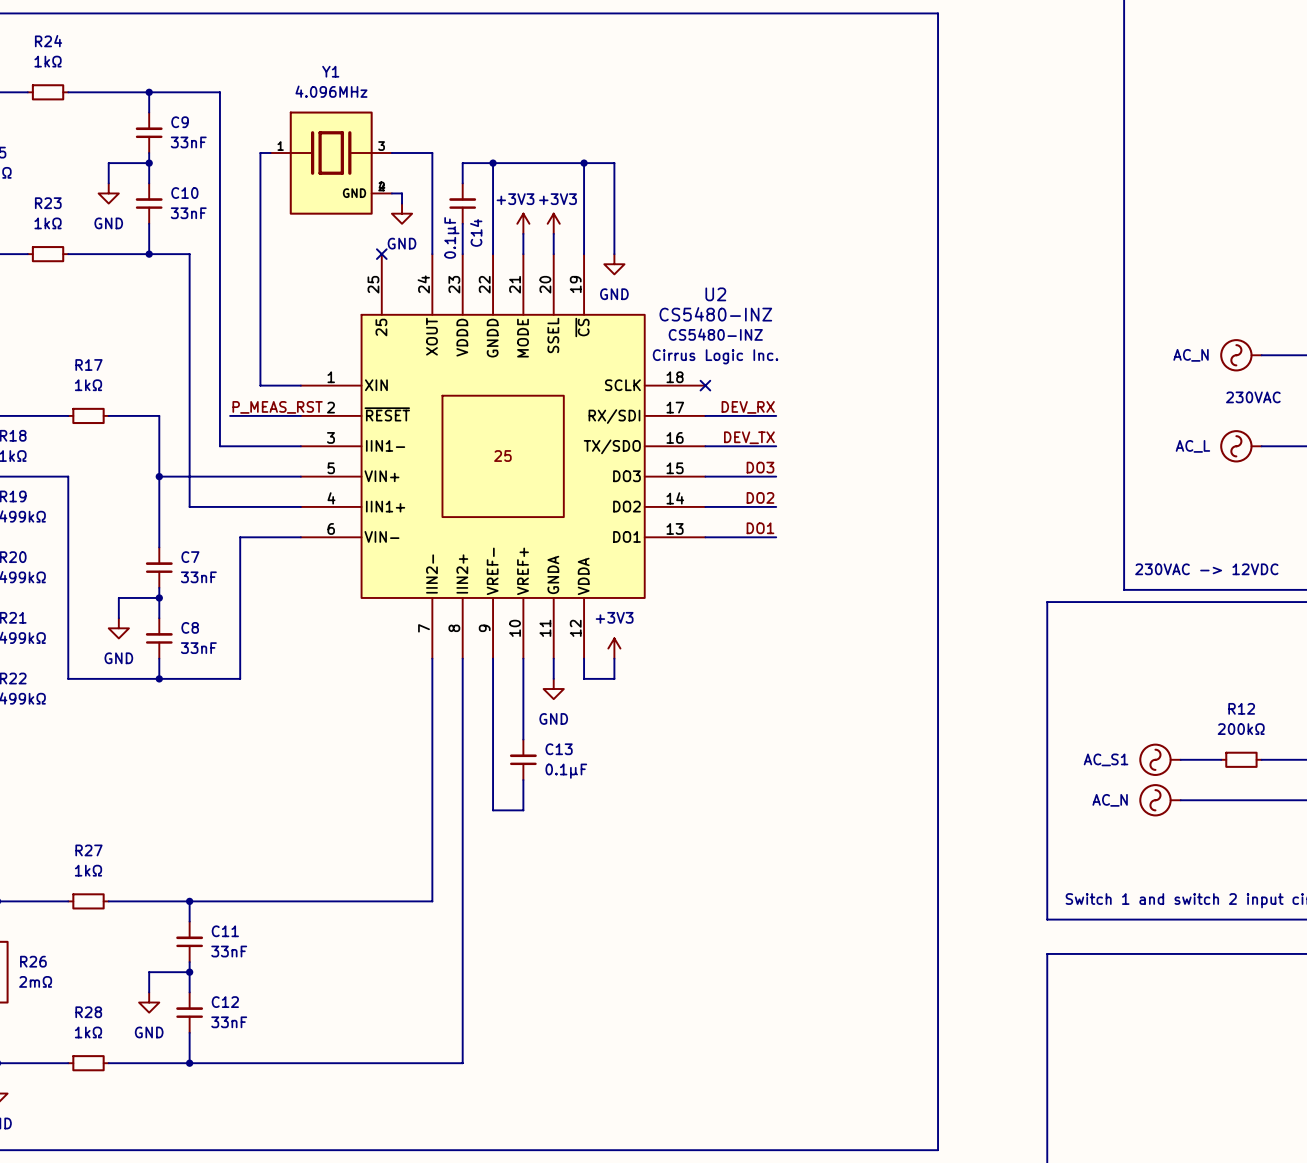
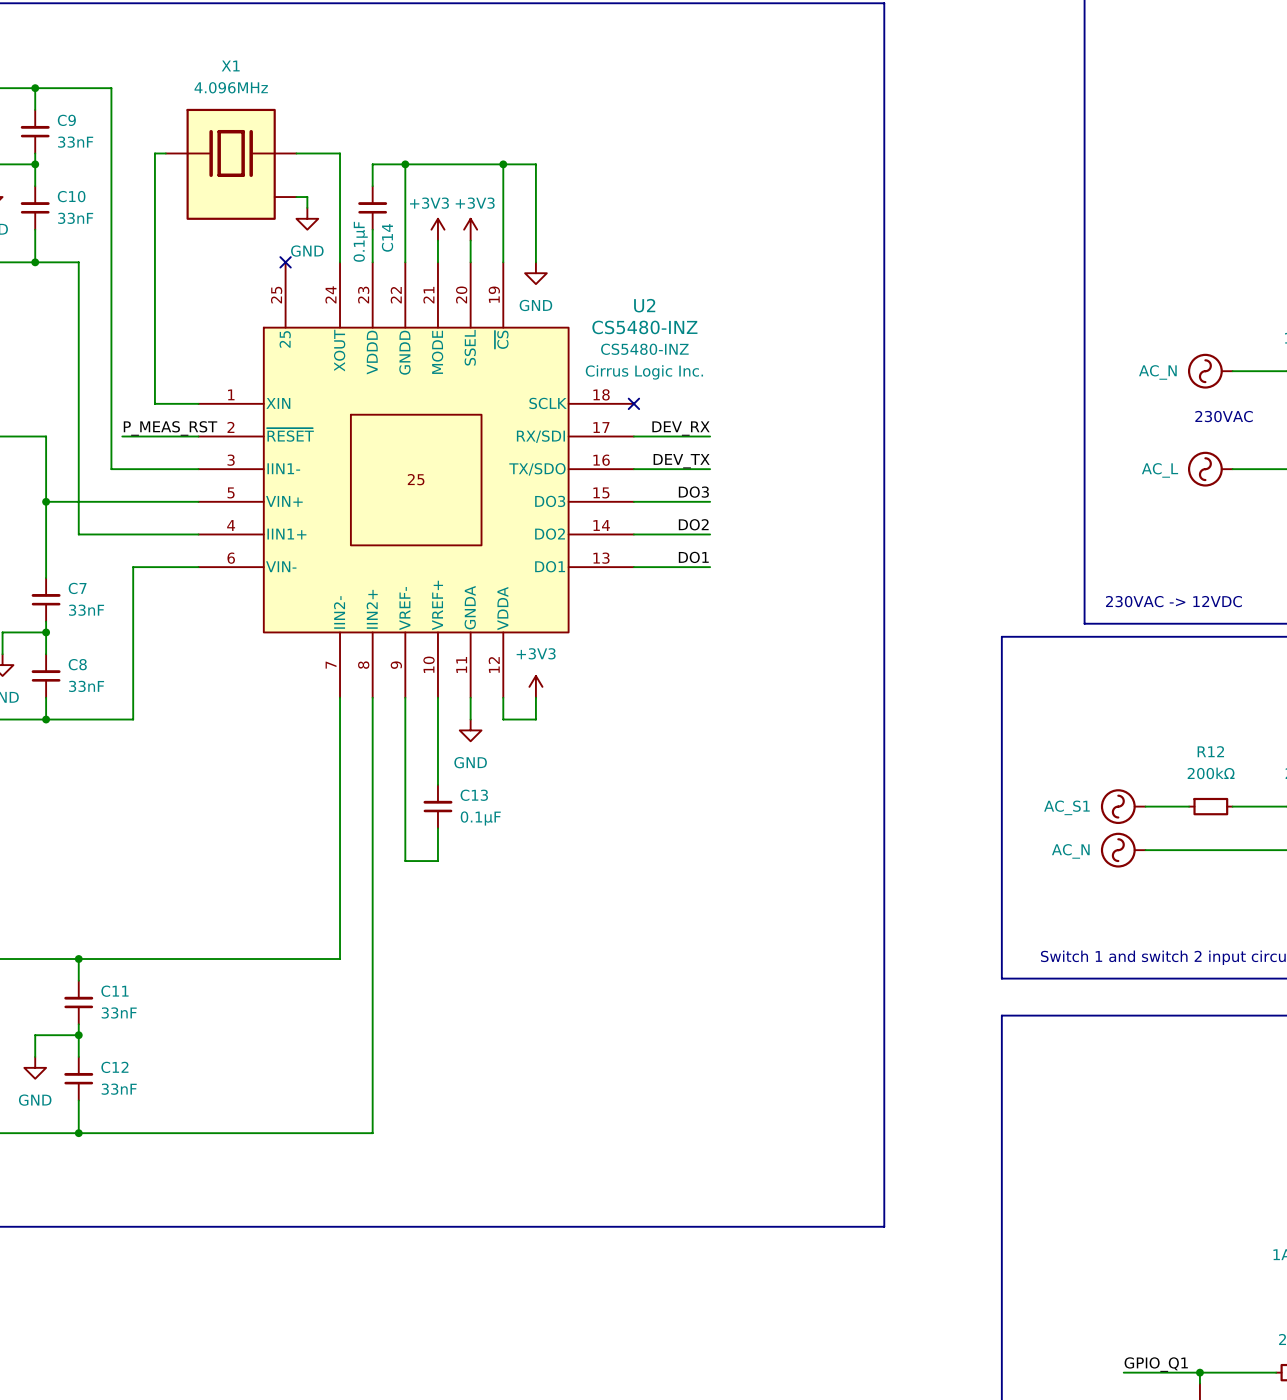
Y1 name: Y1 (330, 71) -> X1 (230, 65)
Y1 symbol: [270, 111, 392, 215] -> [165, 108, 297, 220]

